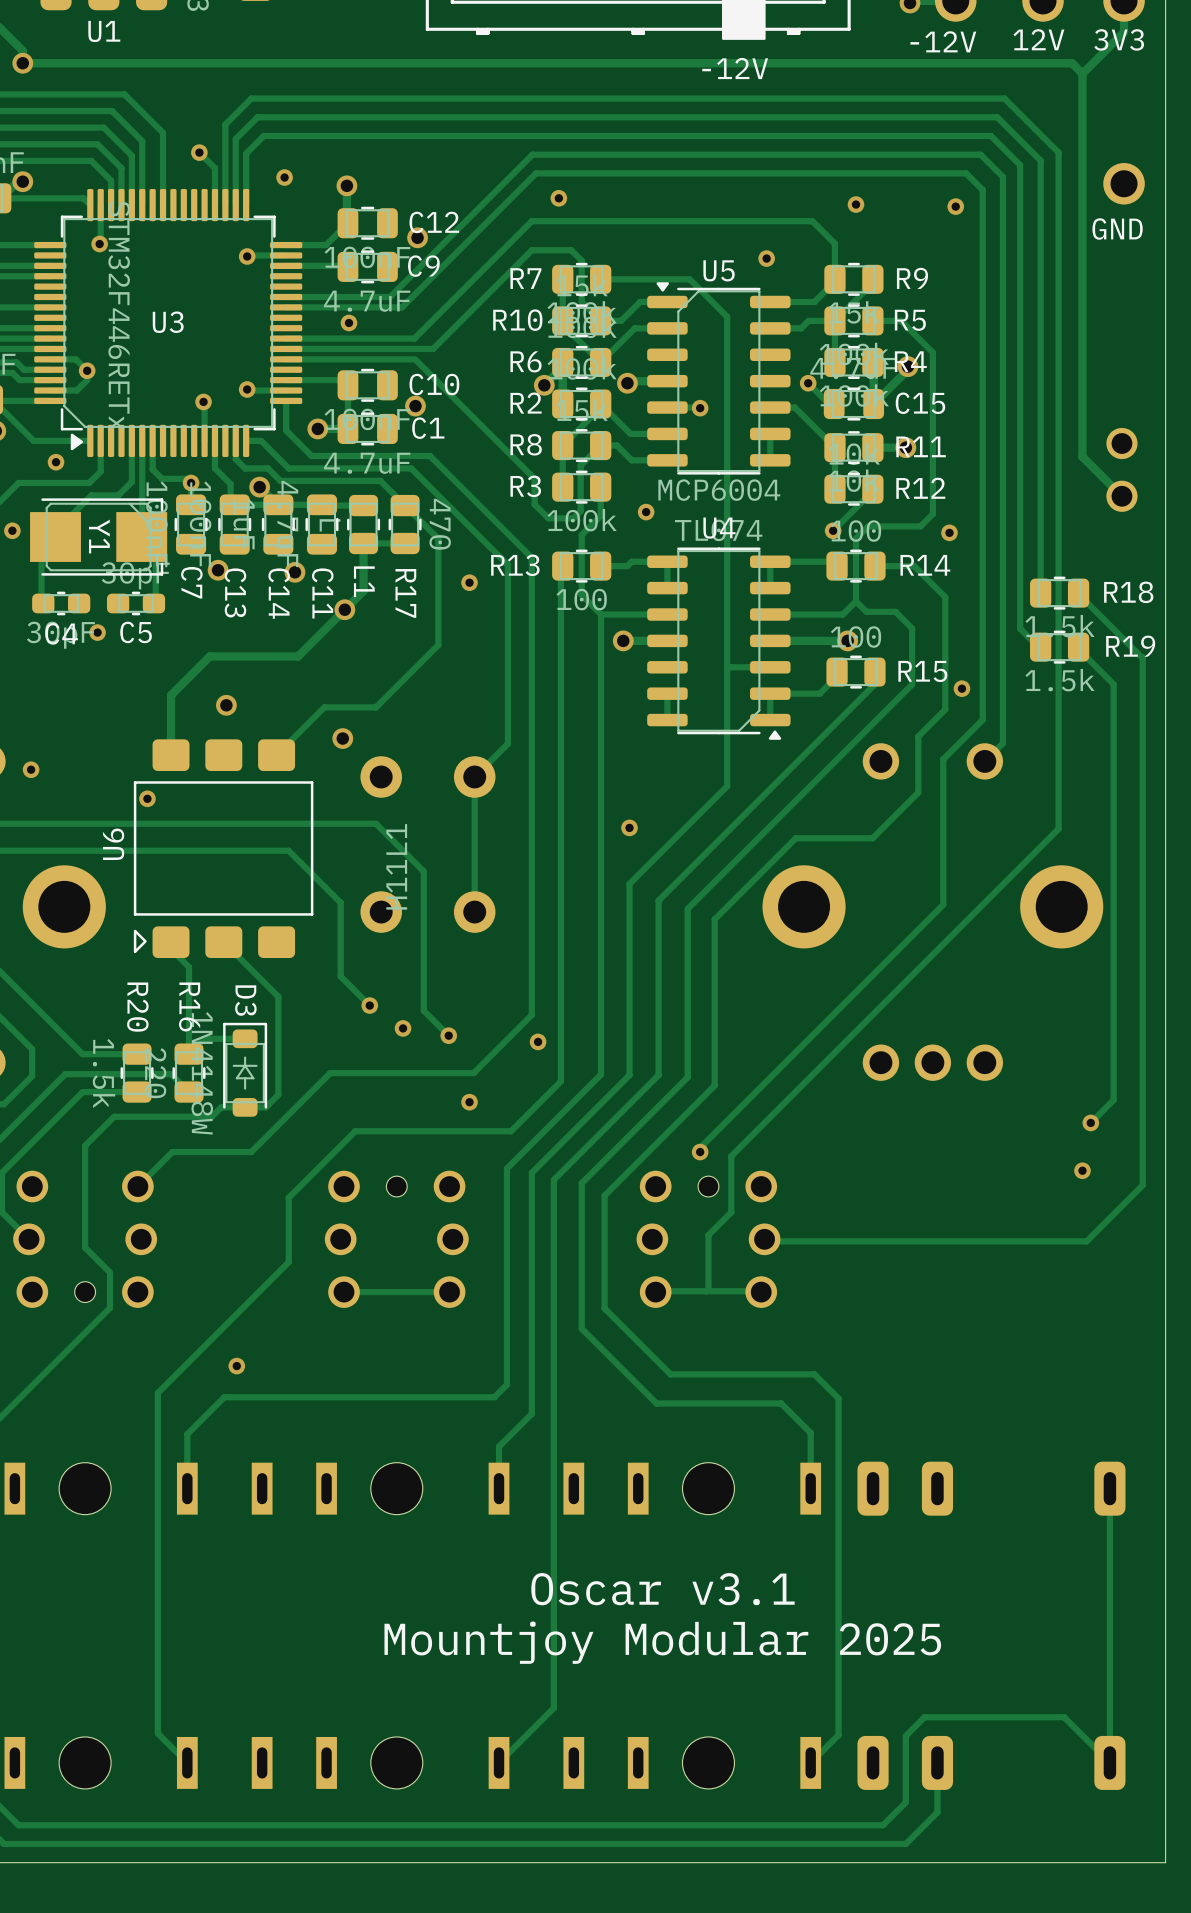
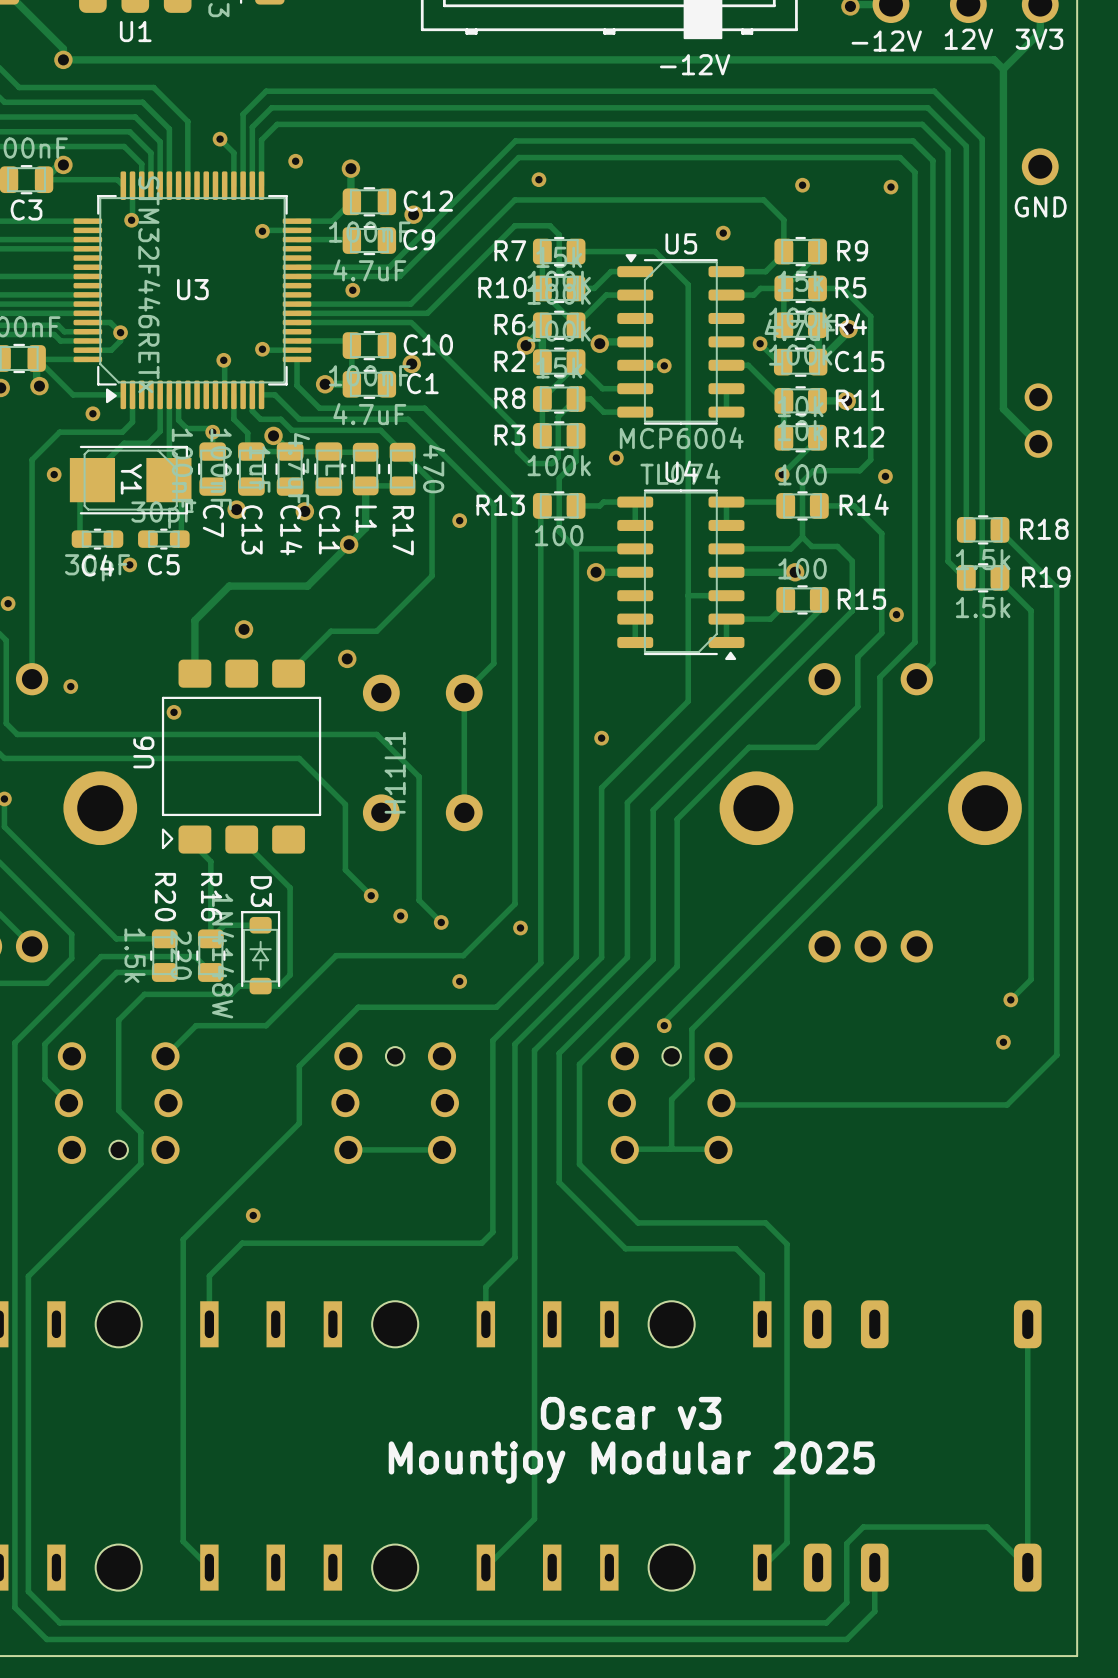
text: Oscar v3.1 (662, 1589) -> Oscar v3 (631, 1413)

